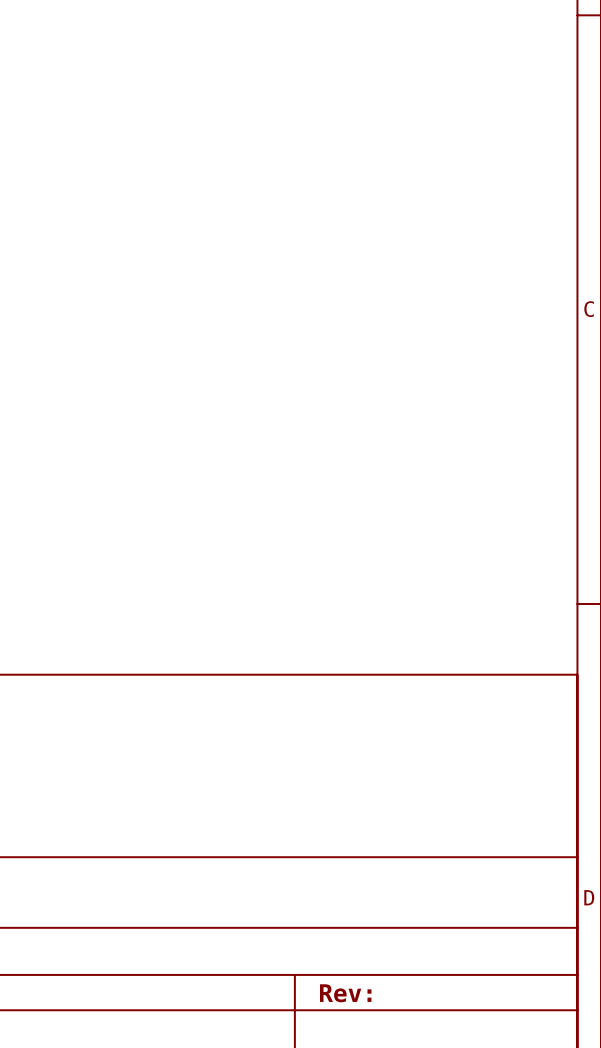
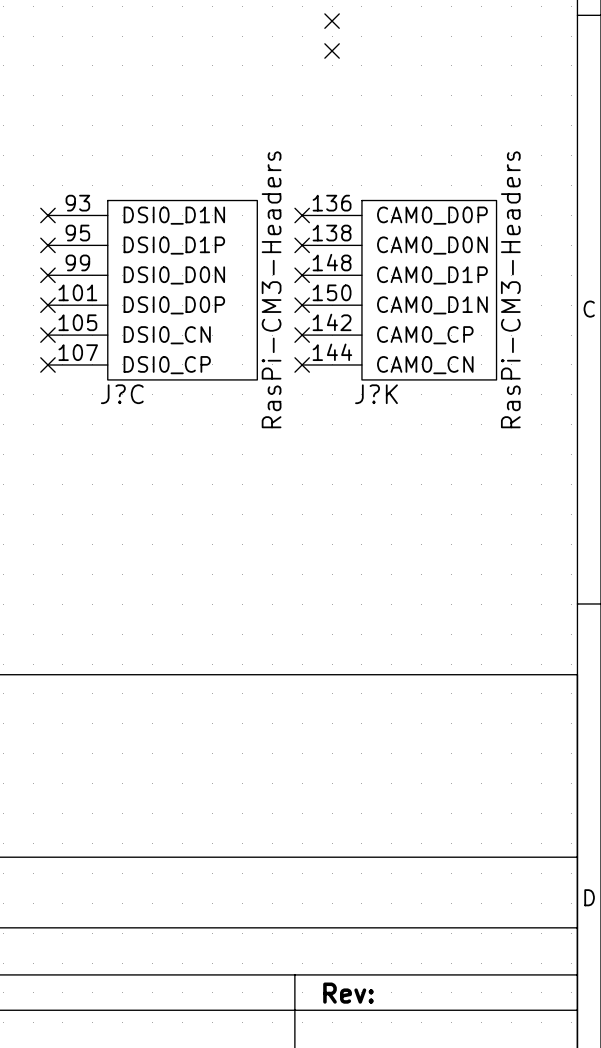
no-connect mark: none -> (332, 21)
no-connect mark: none -> (332, 50)
no-connect mark: none -> (47, 215)
no-connect mark: none -> (302, 215)
no-connect mark: none -> (47, 245)
no-connect mark: none -> (302, 245)
no-connect mark: none -> (47, 275)
no-connect mark: none -> (302, 275)
J?C: none -> RasPi-CM3-Headers (152, 290)
J?K: none -> RasPi-CM3-Headers (399, 290)
no-connect mark: none -> (47, 305)
no-connect mark: none -> (302, 305)
no-connect mark: none -> (47, 335)
no-connect mark: none -> (302, 335)
no-connect mark: none -> (47, 364)
no-connect mark: none -> (302, 364)

